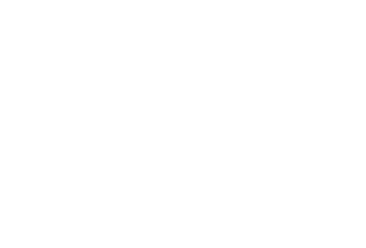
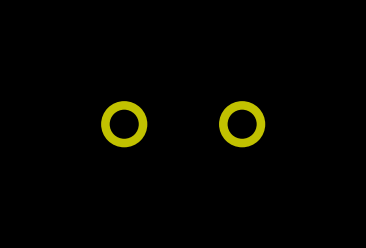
part: none -> (183, 124)

